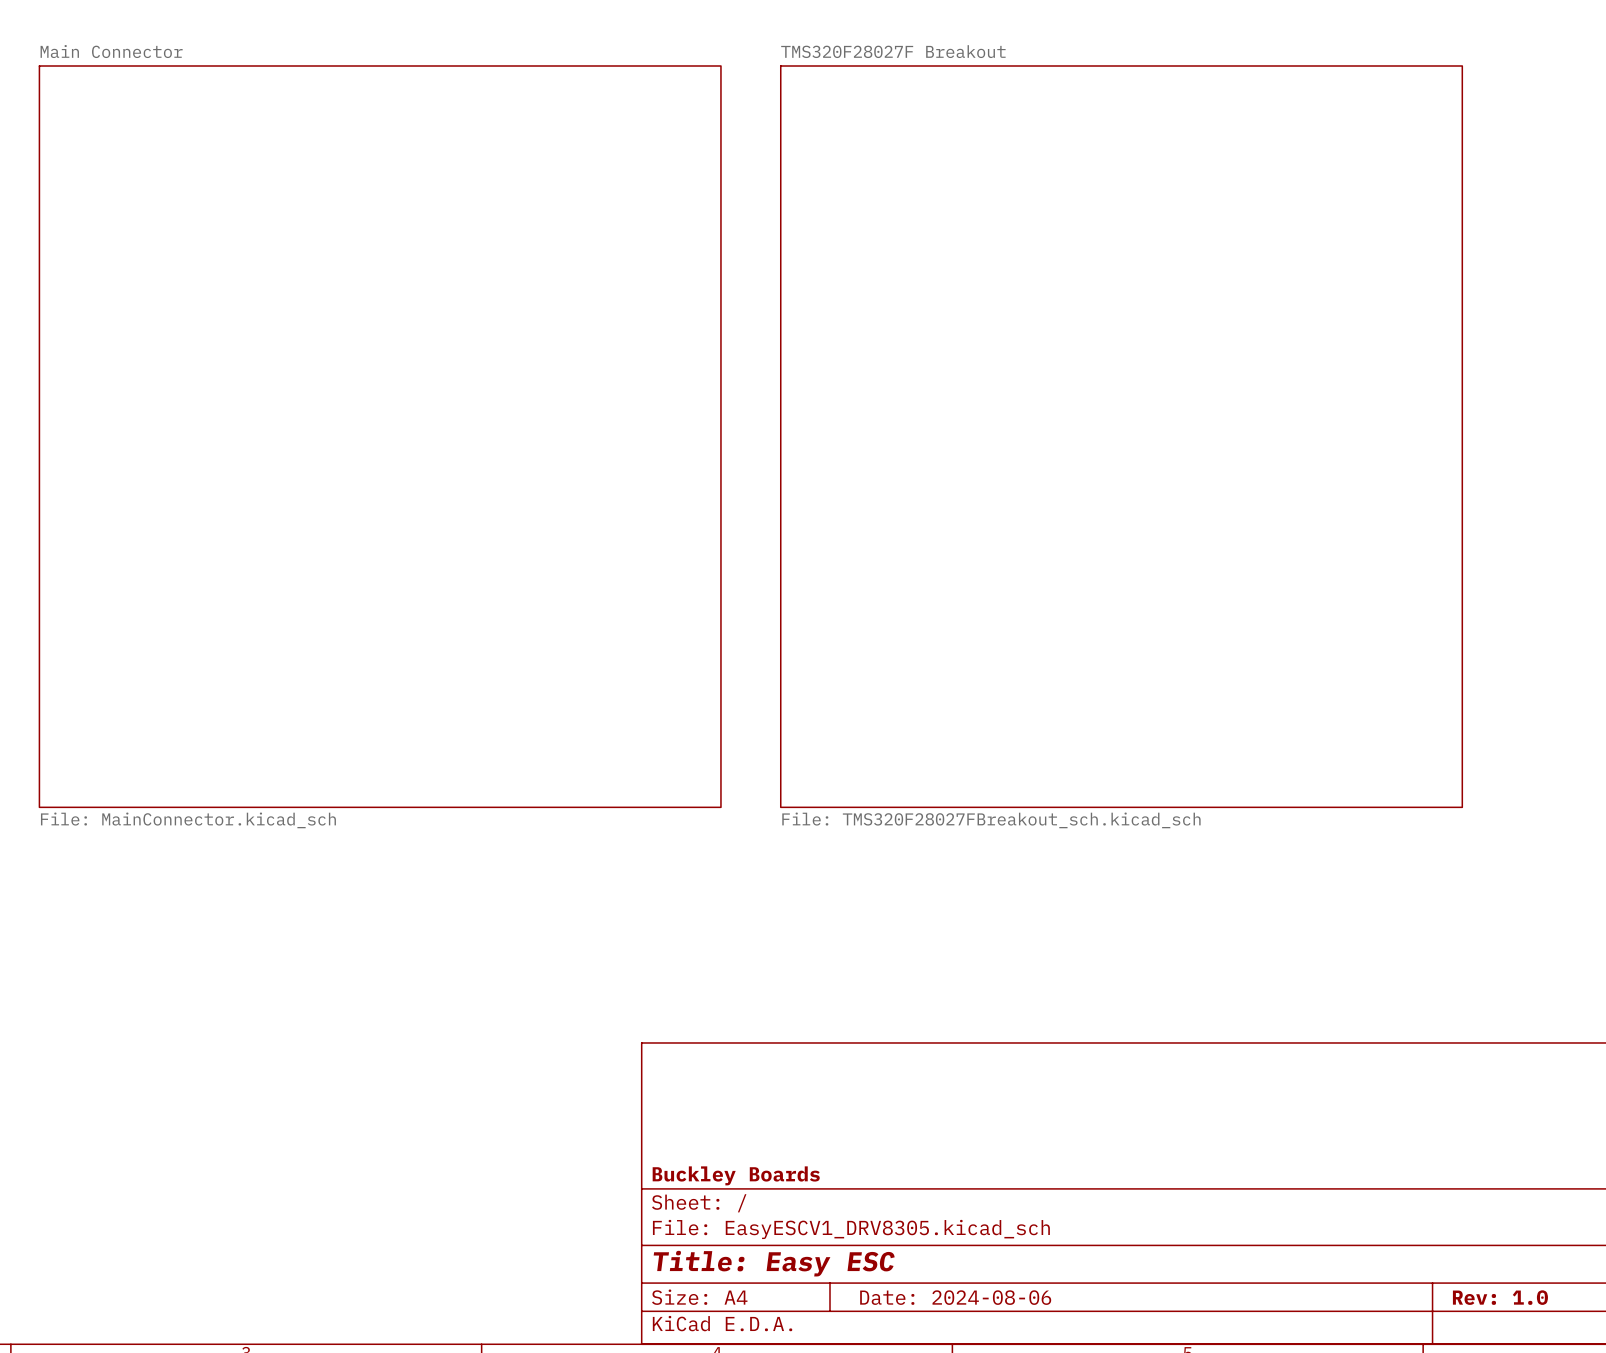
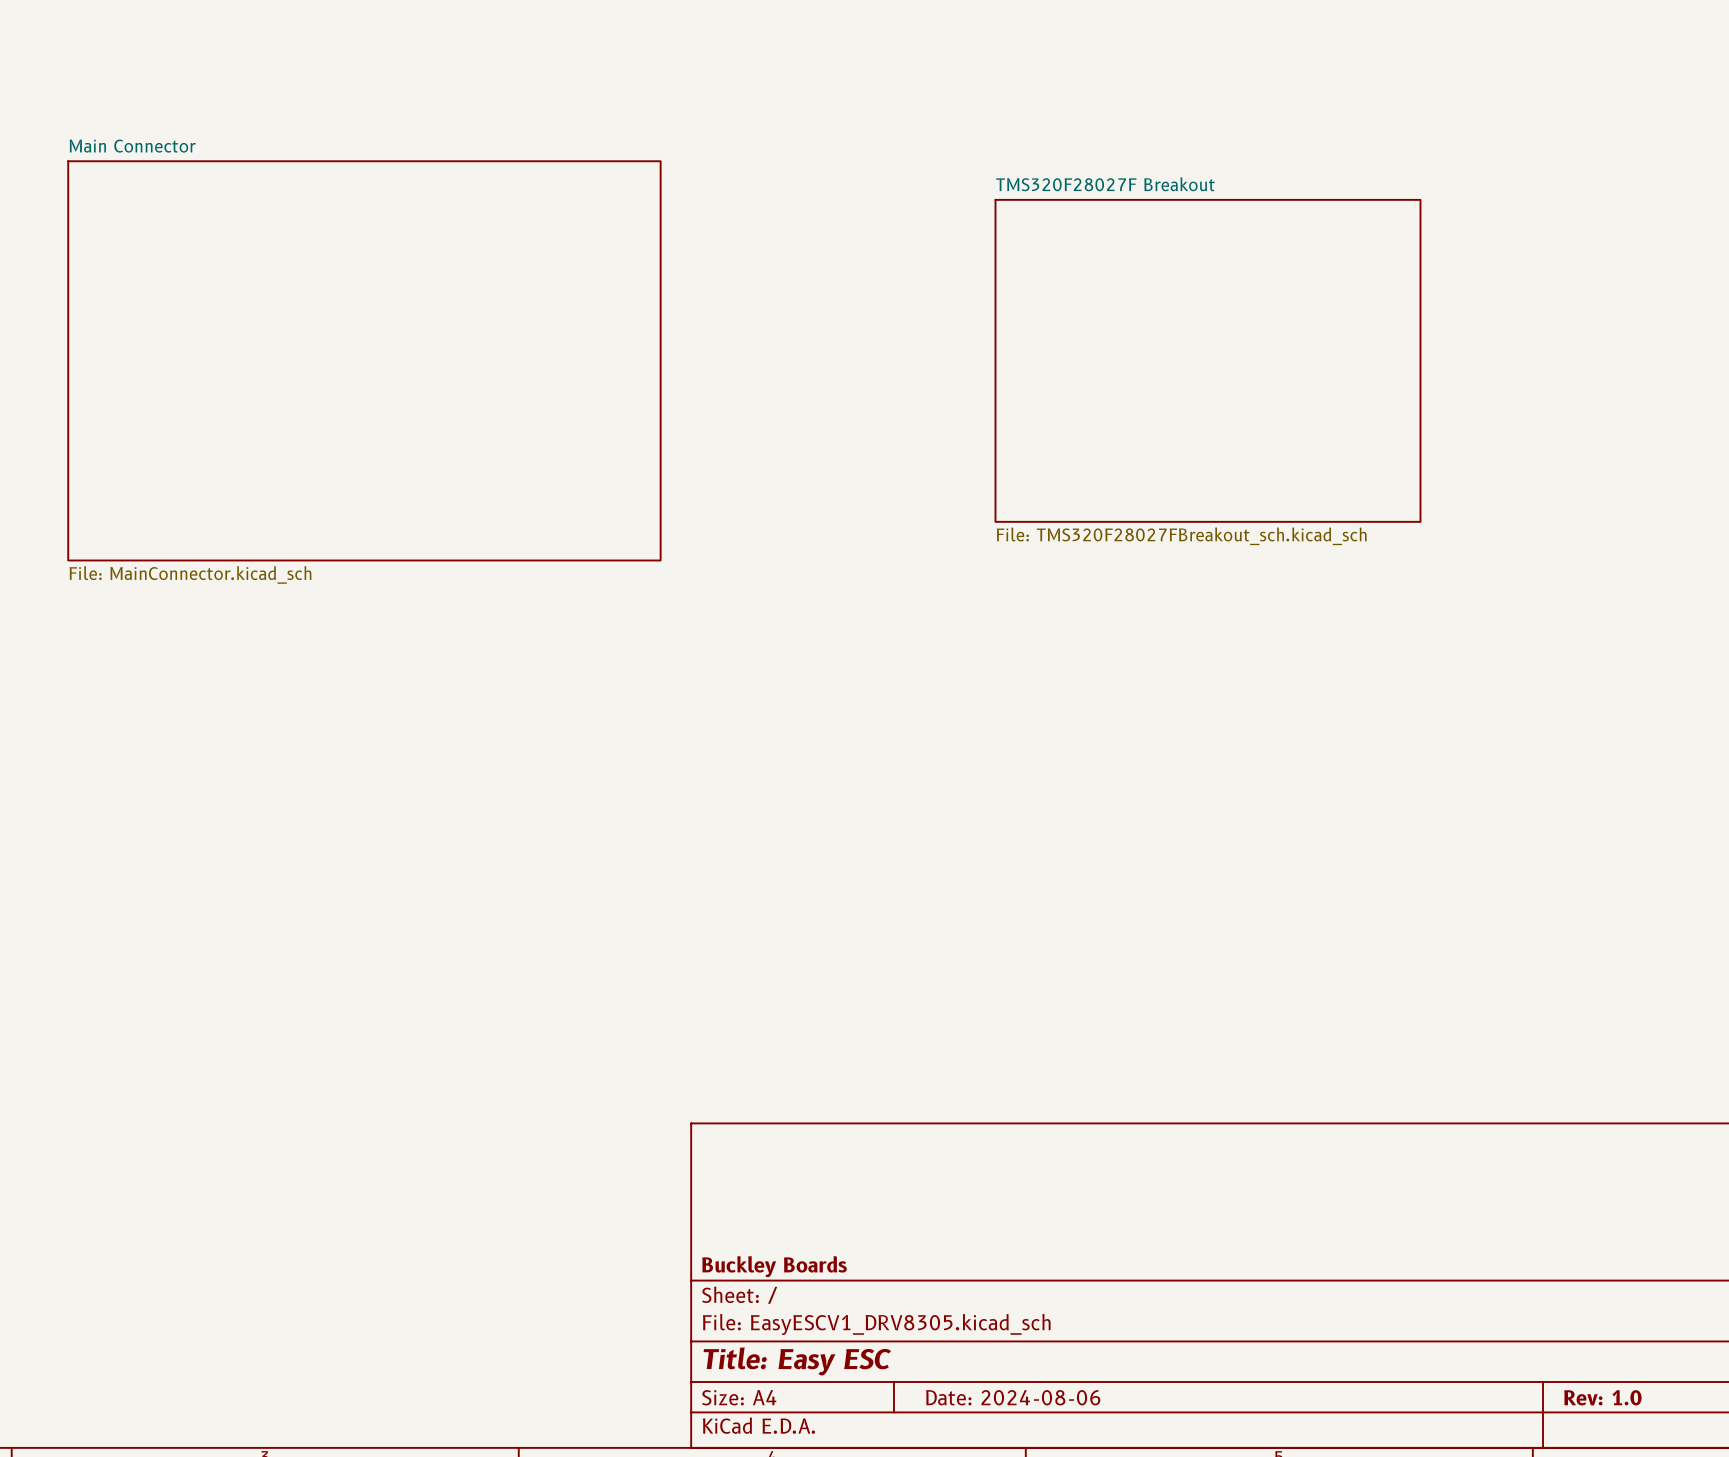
sheet TMS320F28027F Breakout name position: TMS320F28027F Breakout (893, 51) -> TMS320F28027F Breakout (1105, 184)
sheet TMS320F28027F Breakout shape: [780, 65, 1464, 809] -> [994, 199, 1422, 523]
sheet Main Connector: none -> File: MainConnector.kicad_sch (364, 360)
sheet Main Connector: File: MainConnector.kicad_sch (380, 436) -> none
sheet TMS320F28027F Breakout value position: File: TMS320F28027FBreakout_sch.kicad_sch (991, 820) -> File: TMS320F28027FBreakout_sch.kicad_sch (1181, 536)

